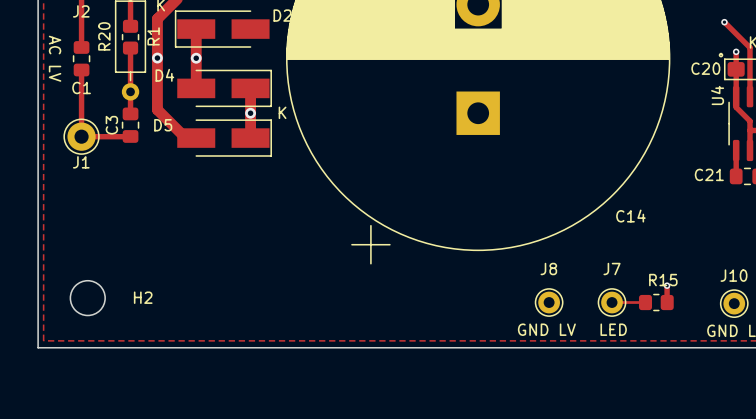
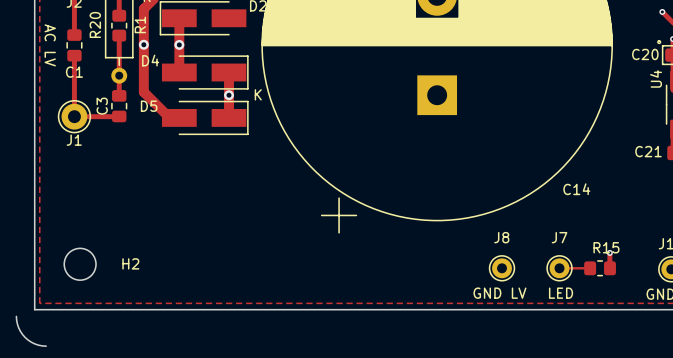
board edge: none -> (16, 316) (18, 327) (25, 337) (34, 343) (46, 346)

